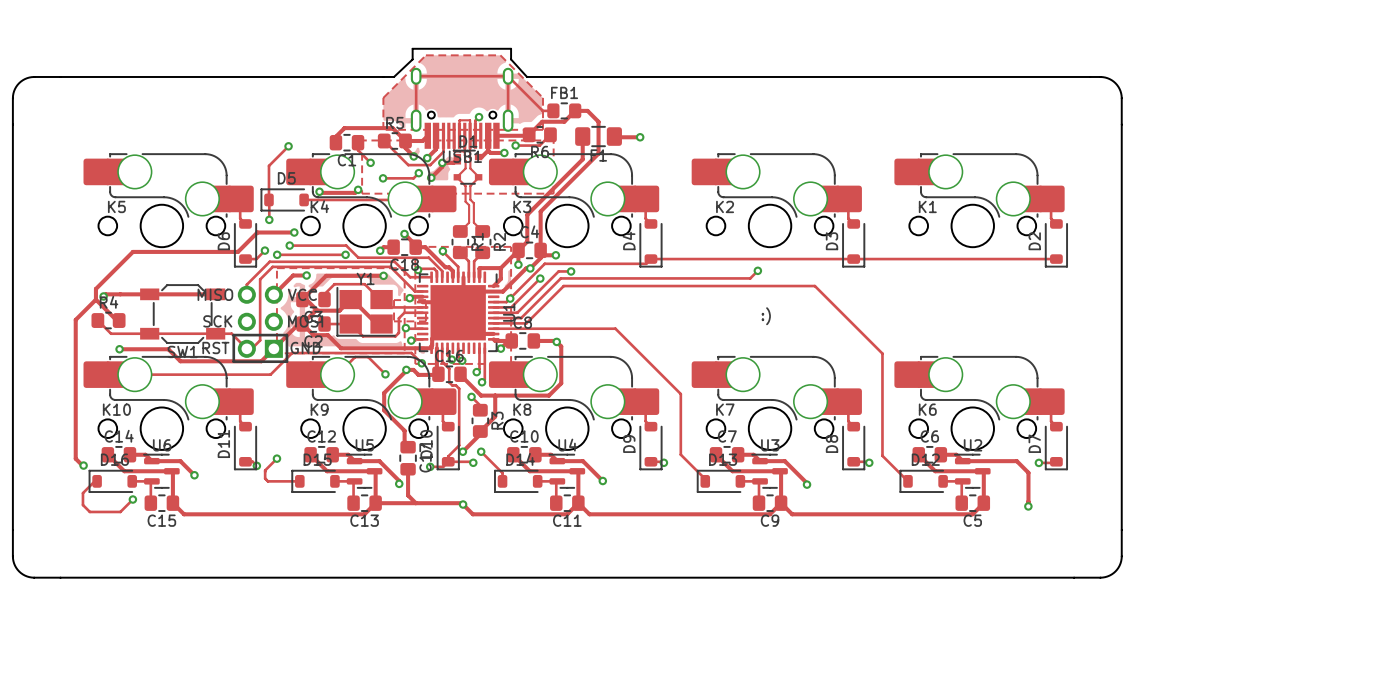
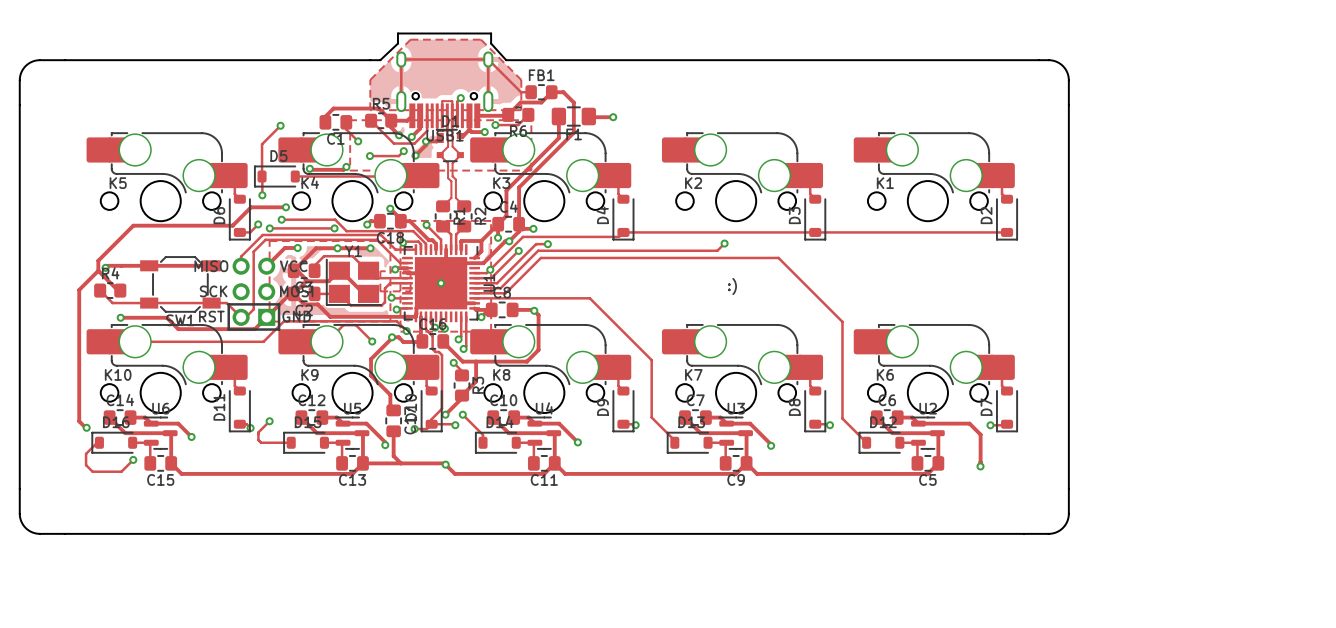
via: none -> (337, 248)
via: none -> (441, 283)

